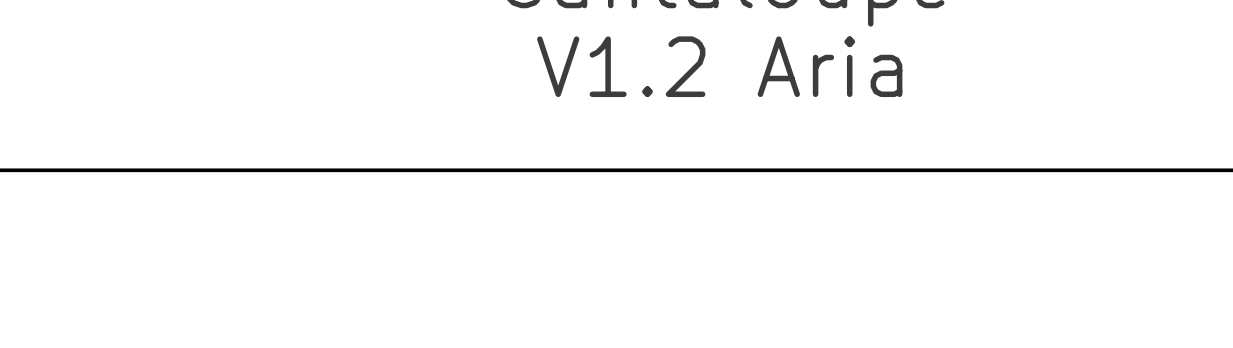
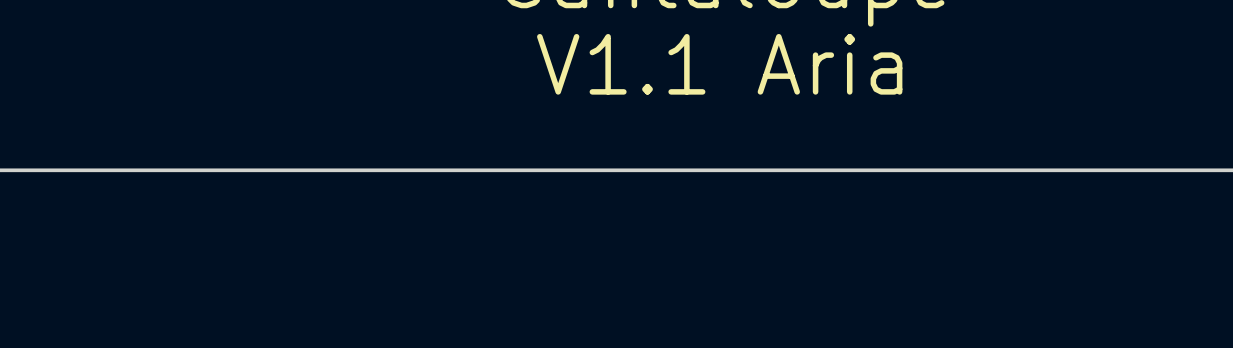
text: V1.2 Aria (719, 66) -> V1.1 Aria (719, 64)

